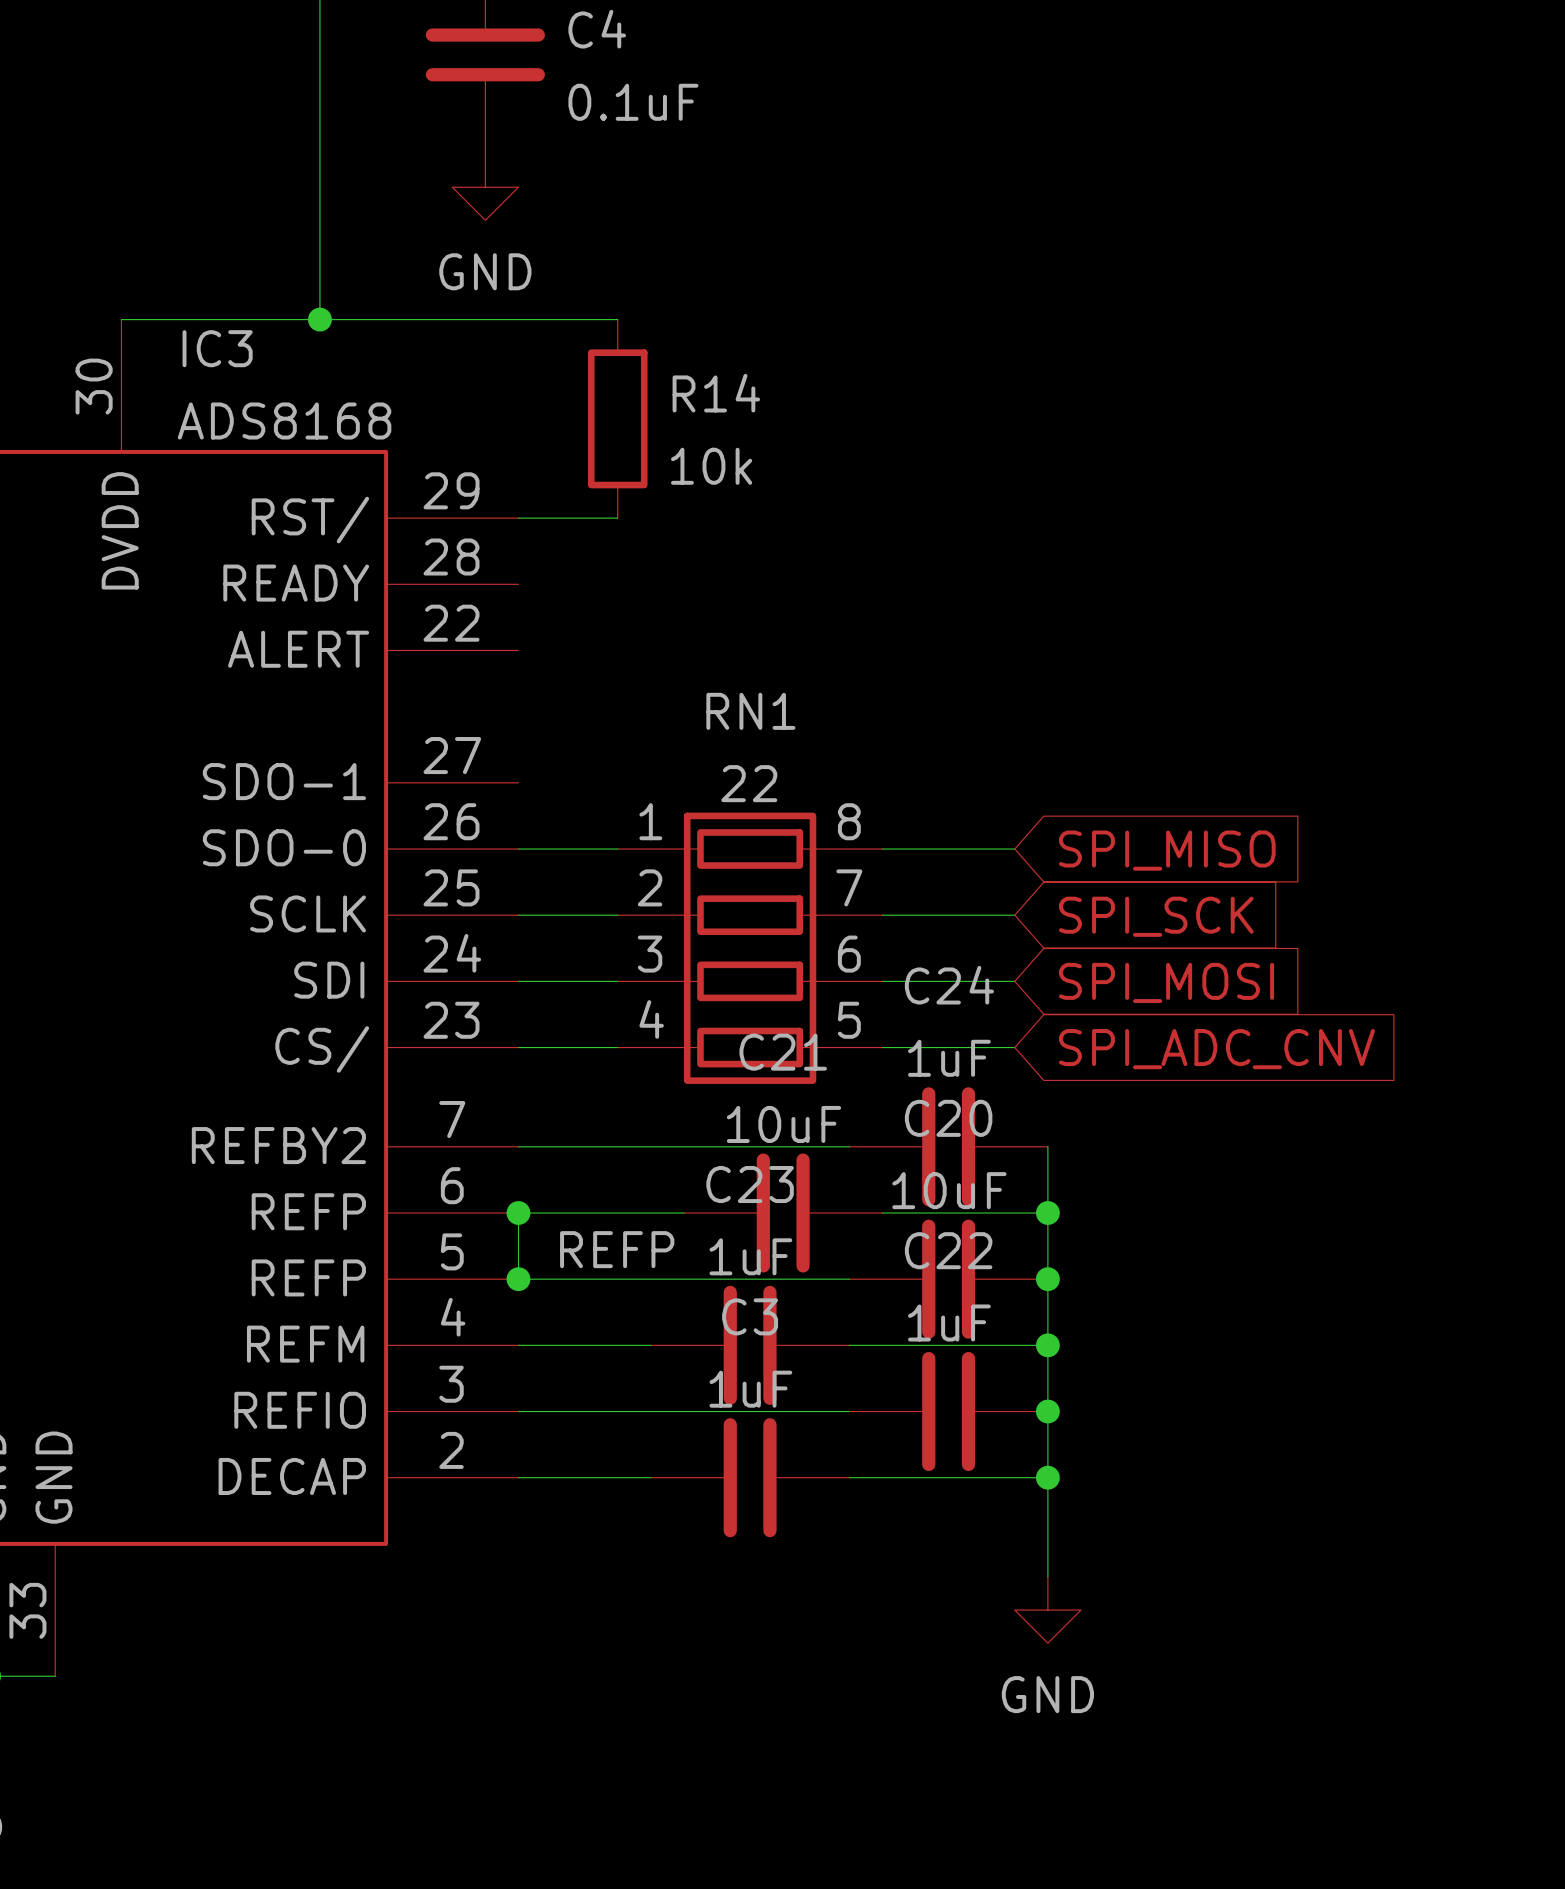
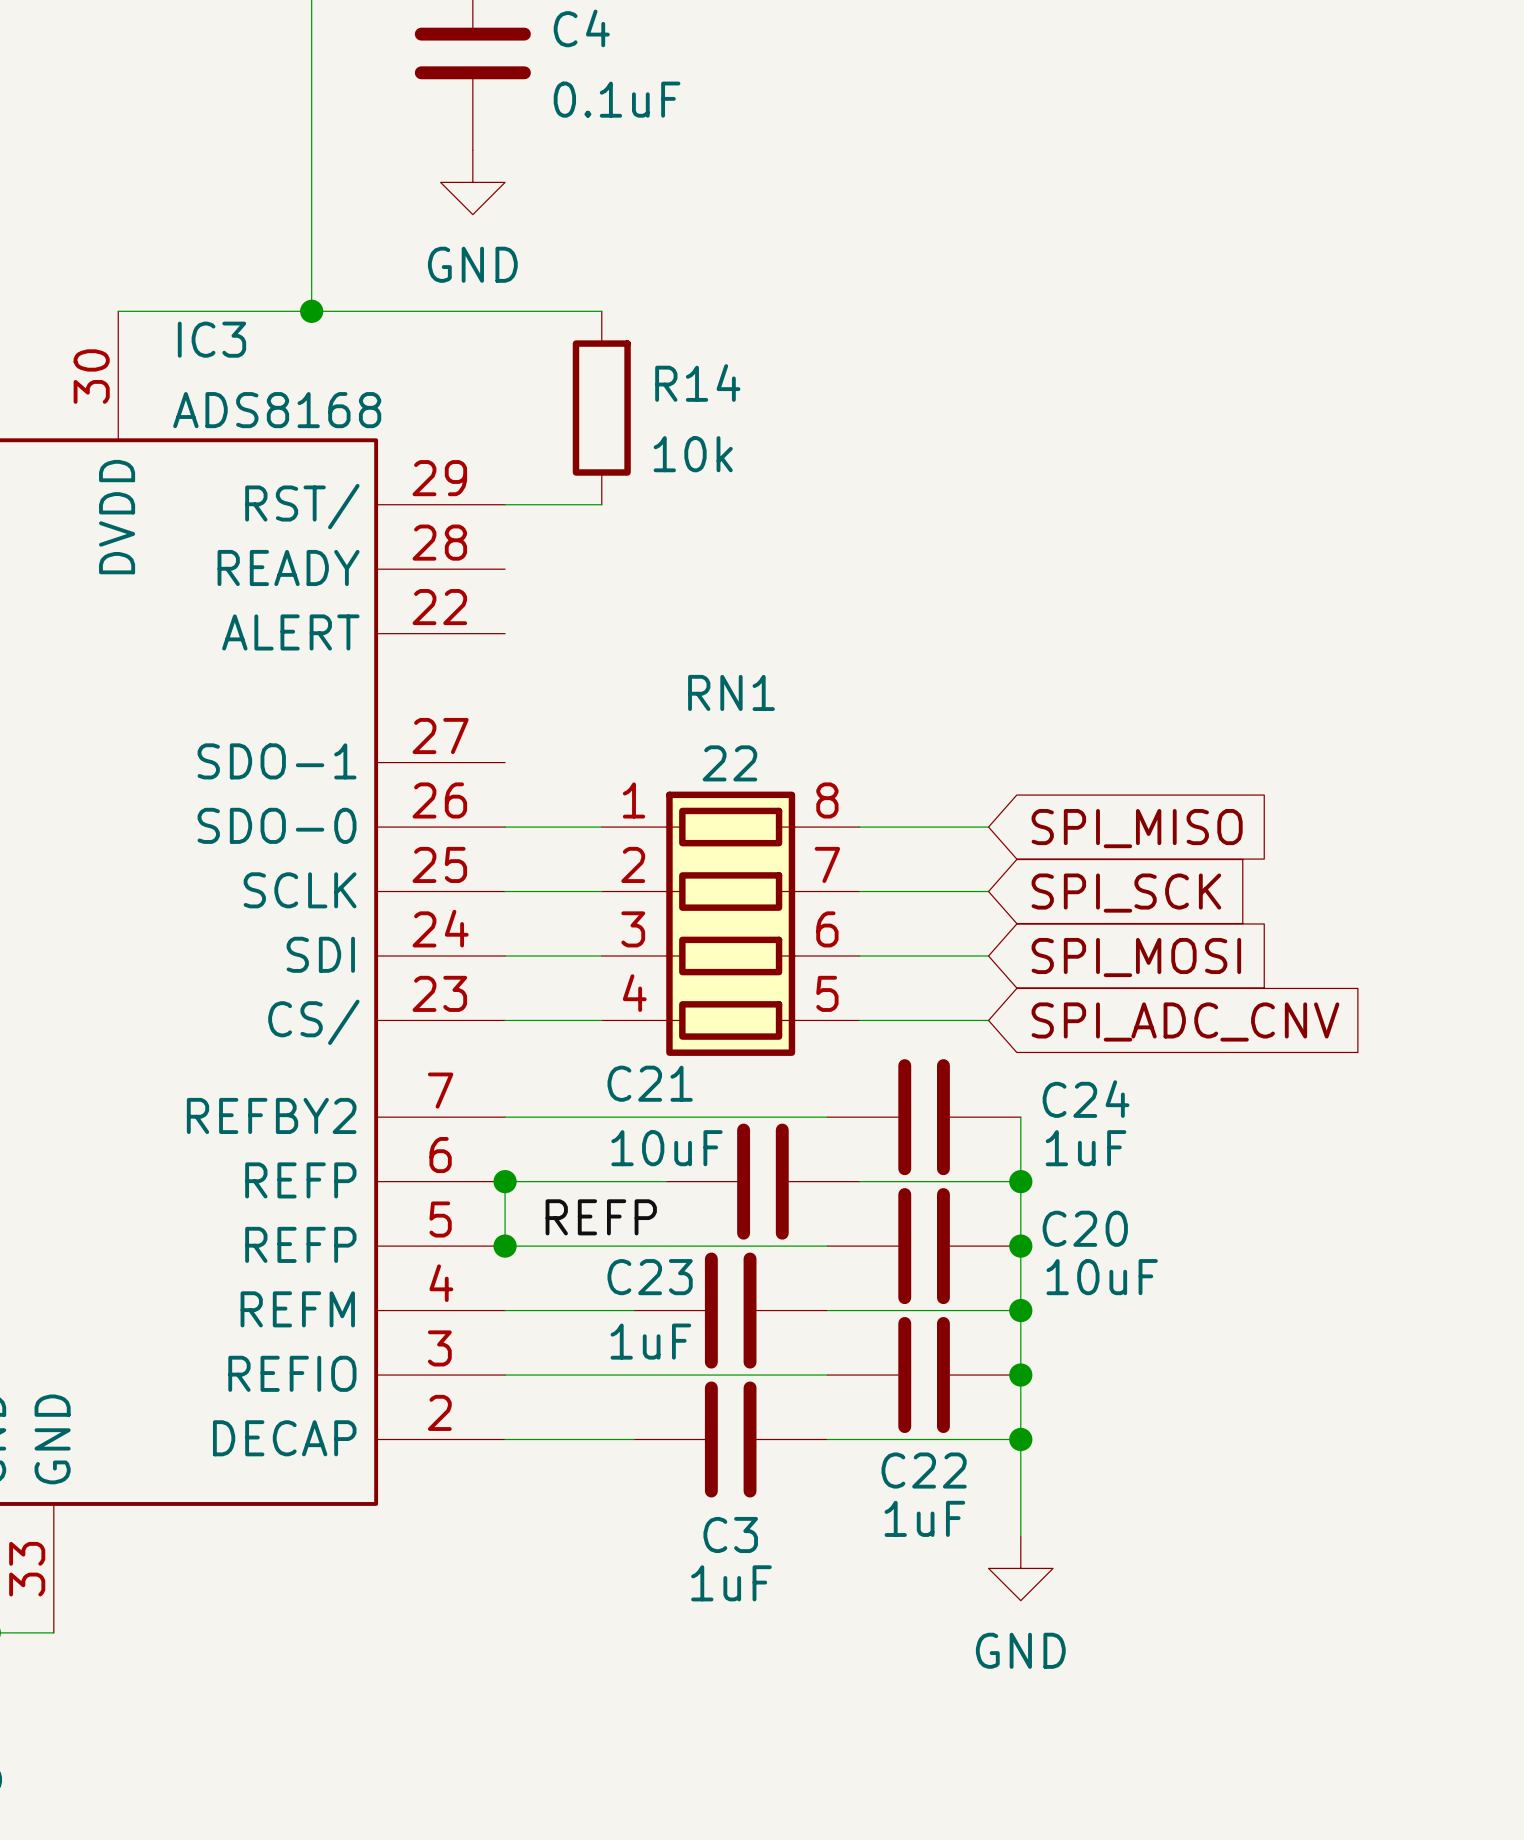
C24 name position: C24 (949, 985) -> C24 (1086, 1099)
C21 name position: C21 (783, 1052) -> C21 (650, 1083)
C24 value position: 1uF (949, 1058) -> 1uF (1086, 1148)
C20 name position: C20 (948, 1118) -> C20 (1085, 1228)
C21 value position: 10uF (783, 1124) -> 10uF (667, 1148)
C23 name position: C23 (750, 1184) -> C23 (650, 1277)
C20 value position: 10uF (949, 1190) -> 10uF (1102, 1277)
C22 name position: C22 (948, 1250) -> C22 (924, 1470)
C23 value position: 1uF (750, 1256) -> 1uF (650, 1341)
C3 name position: C3 (750, 1316) -> C3 (730, 1534)
C22 value position: 1uF (949, 1323) -> 1uF (924, 1518)
C3 value position: 1uF (750, 1389) -> 1uF (731, 1583)

